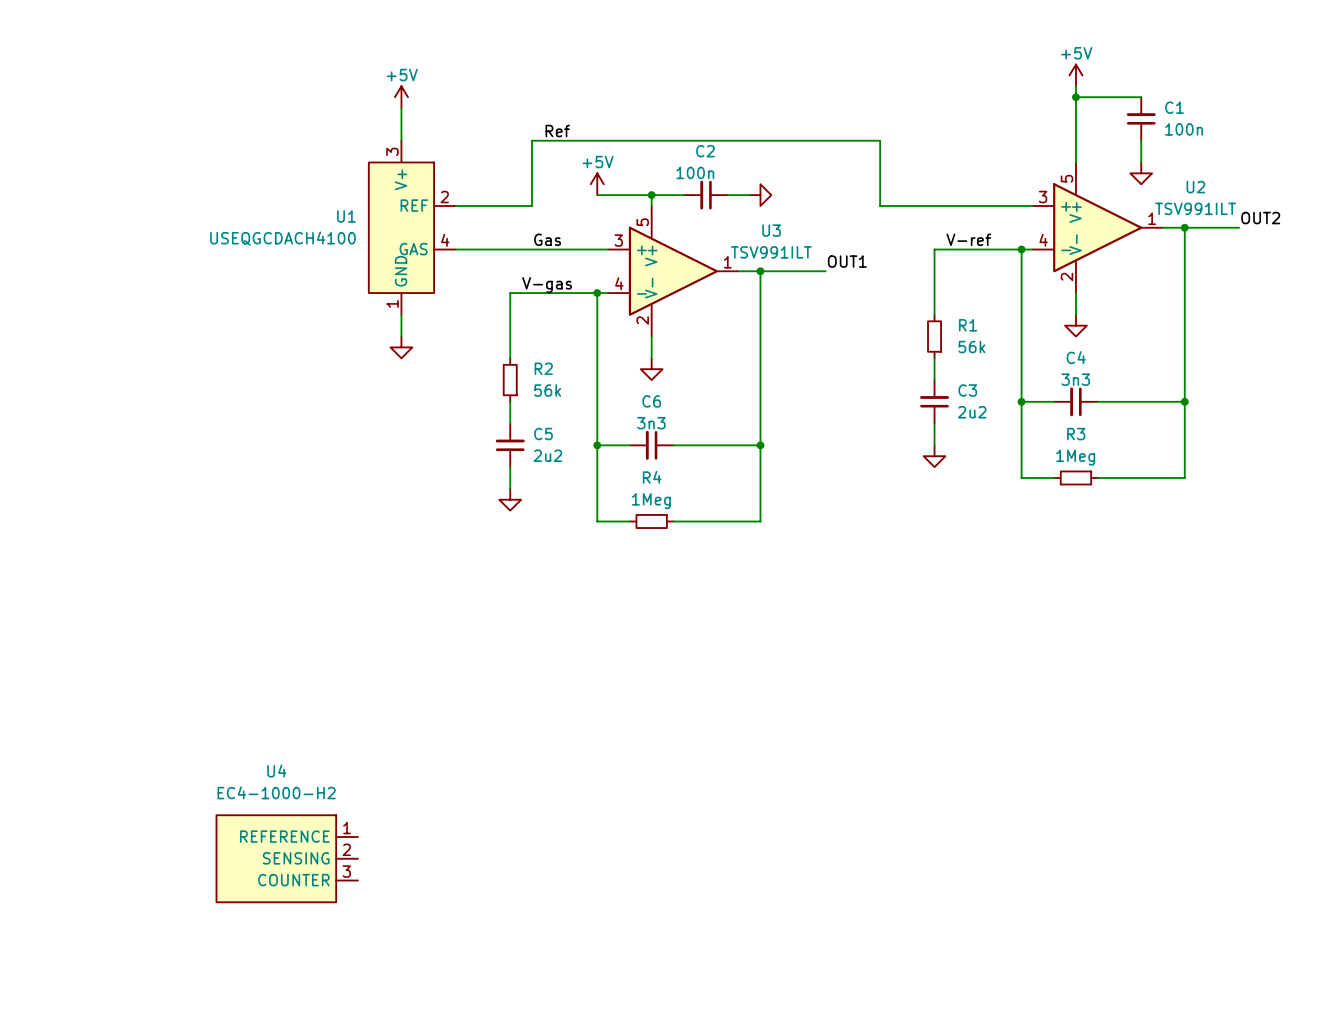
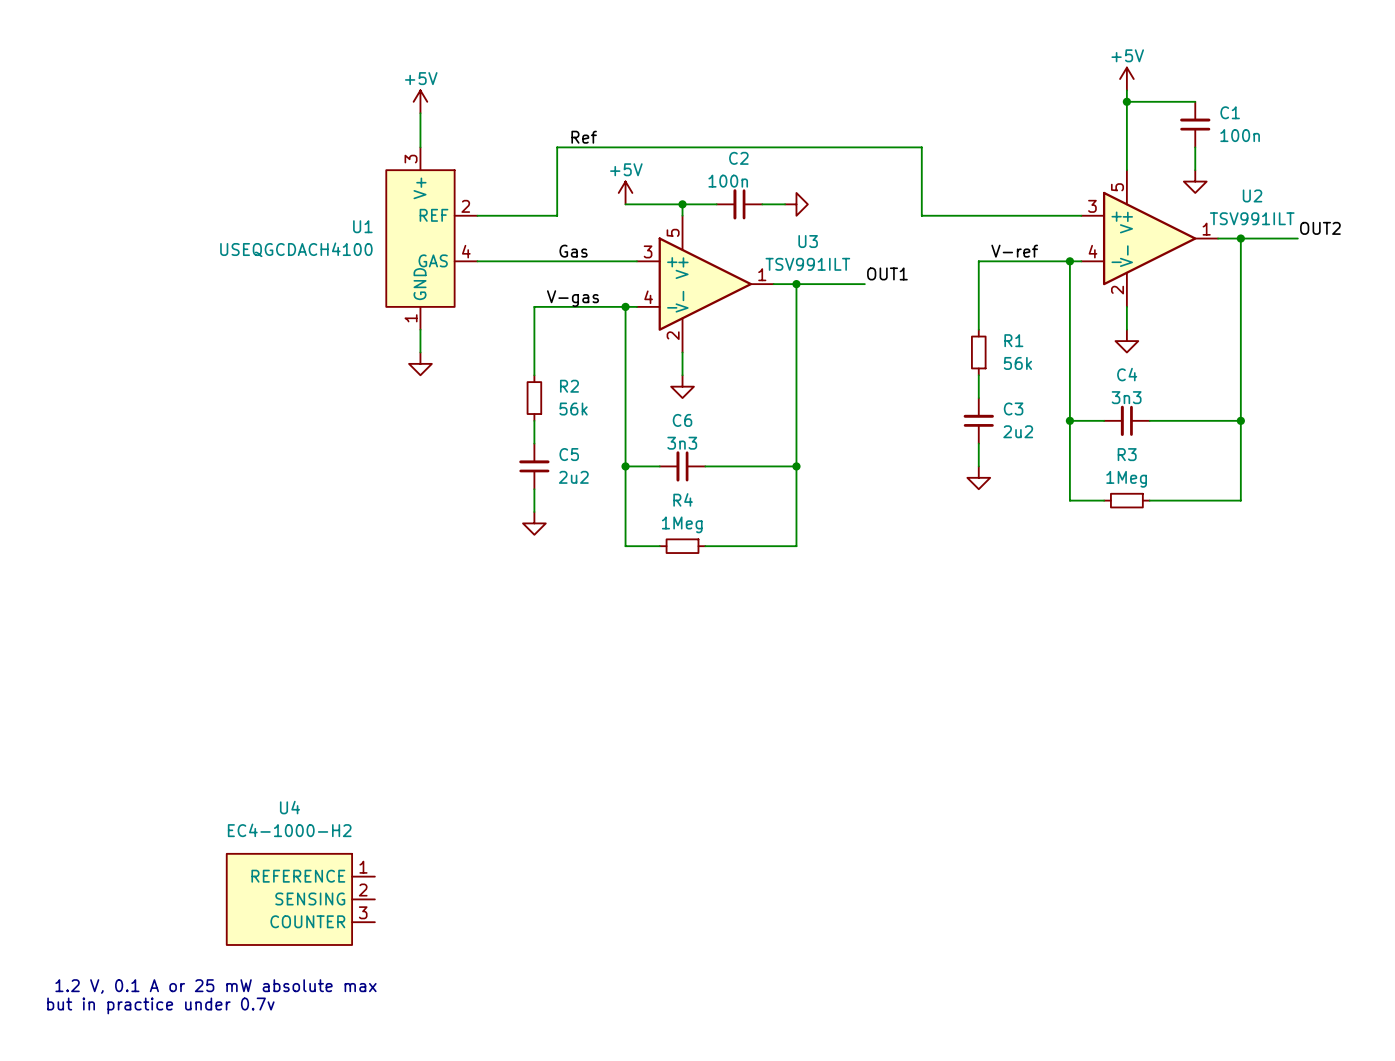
text: none -> 1.2 V, 0.1 A or 25 mW absolute max (215, 986)
text: none -> but in practice under 0.7v (160, 1005)

